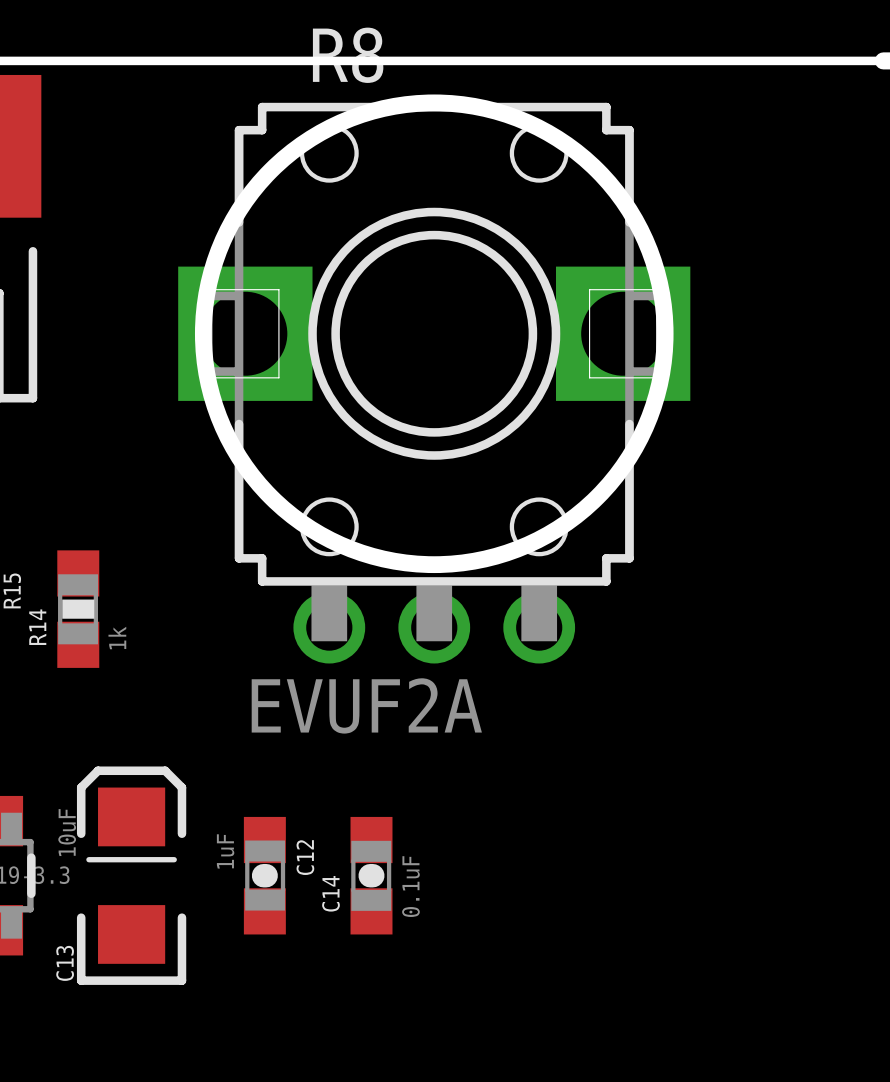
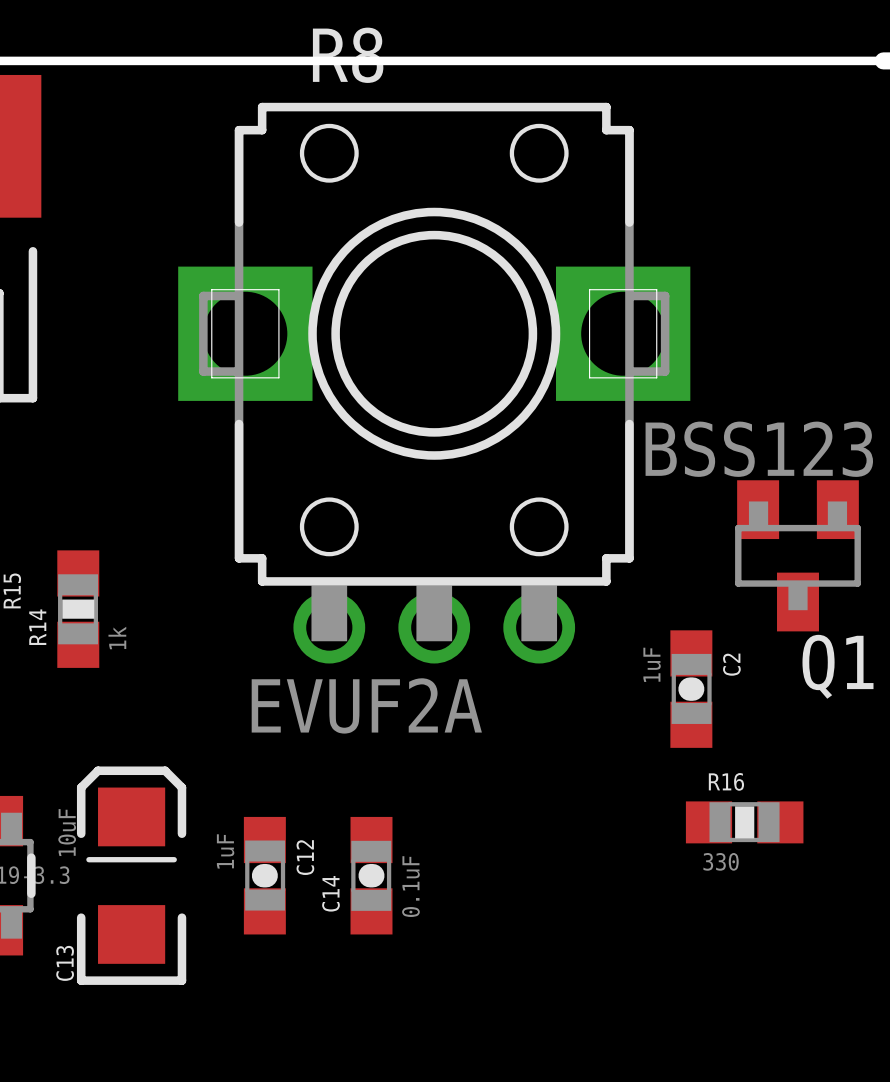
round board edge: [194, 94, 674, 574] -> none
Q1: none -> BSS123 (797, 555)
C2: none -> 1uF (691, 689)
R16: none -> 330 (744, 822)

